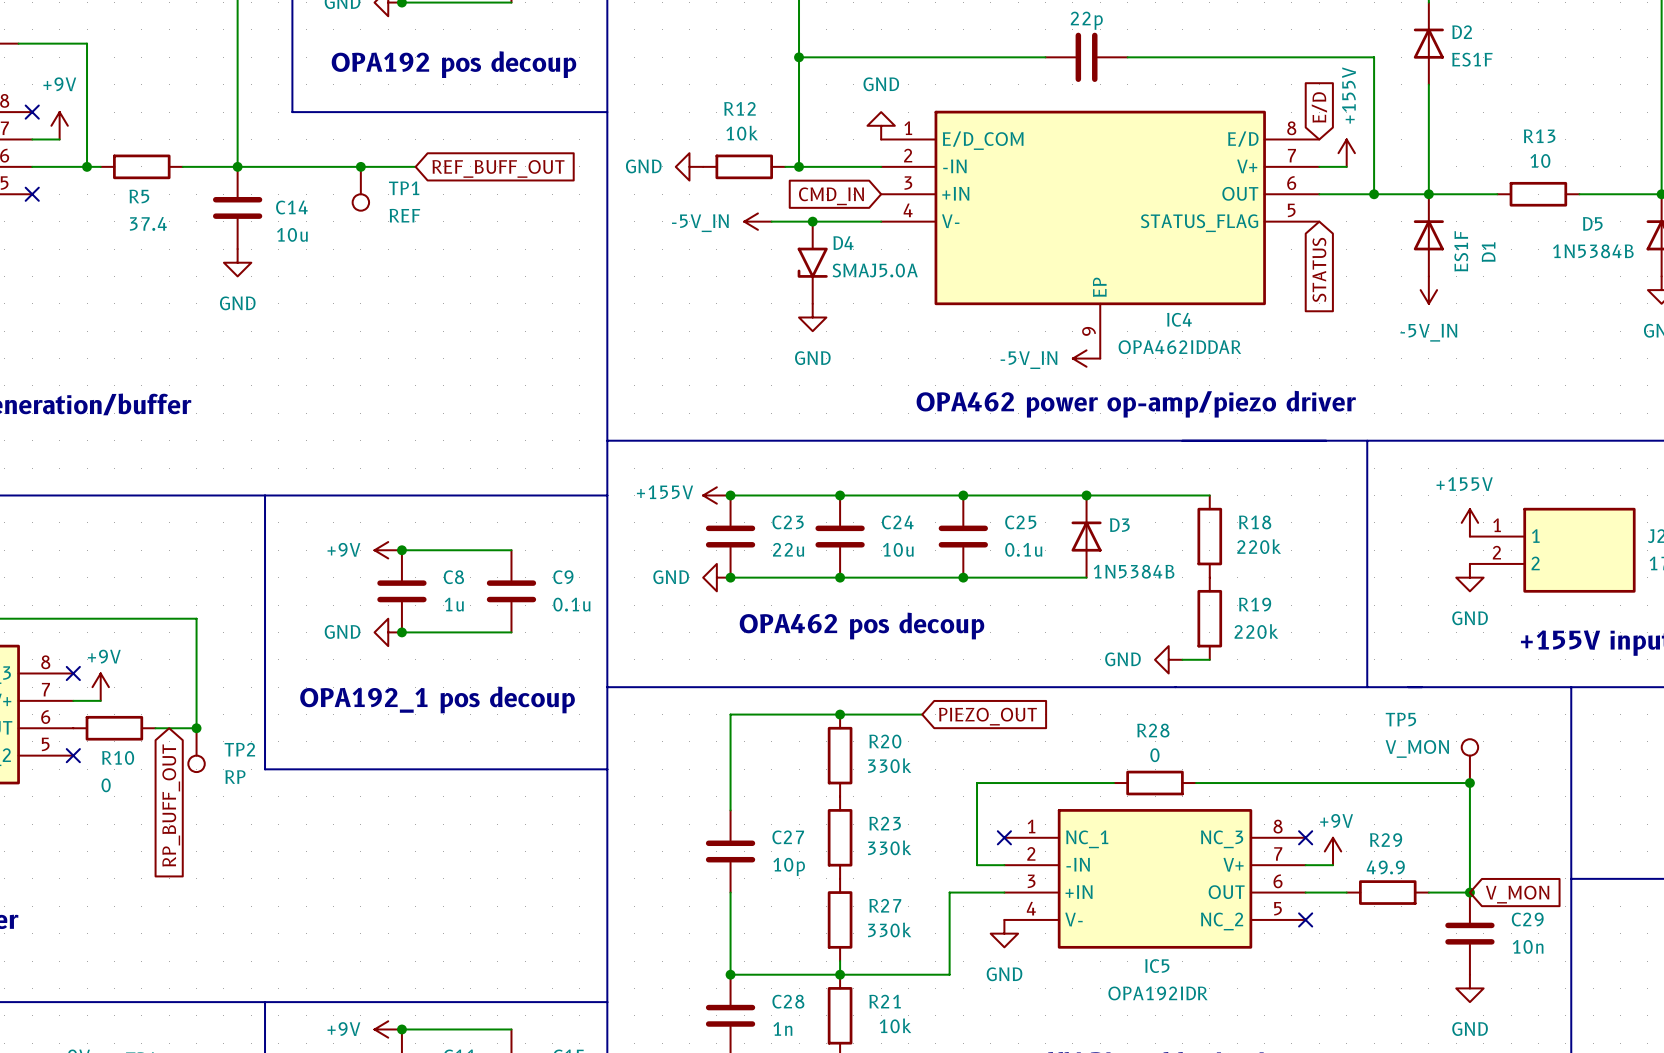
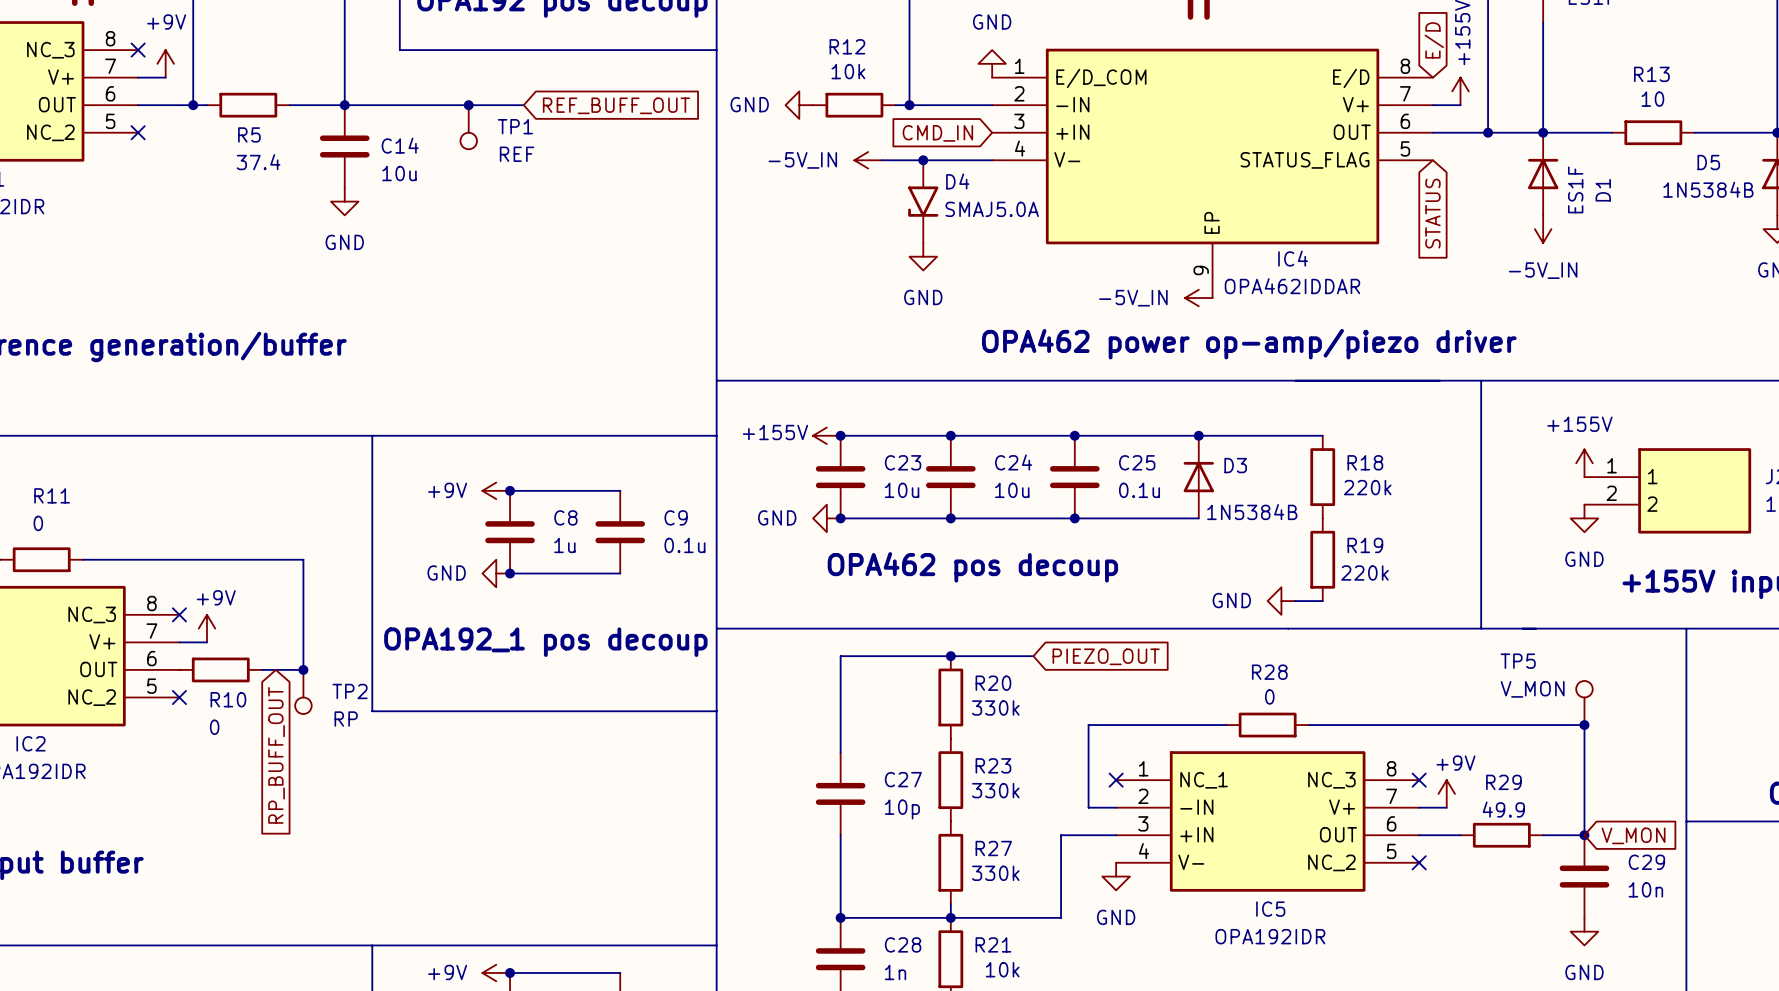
C23 value: 22u (788, 549) -> 10u (902, 490)

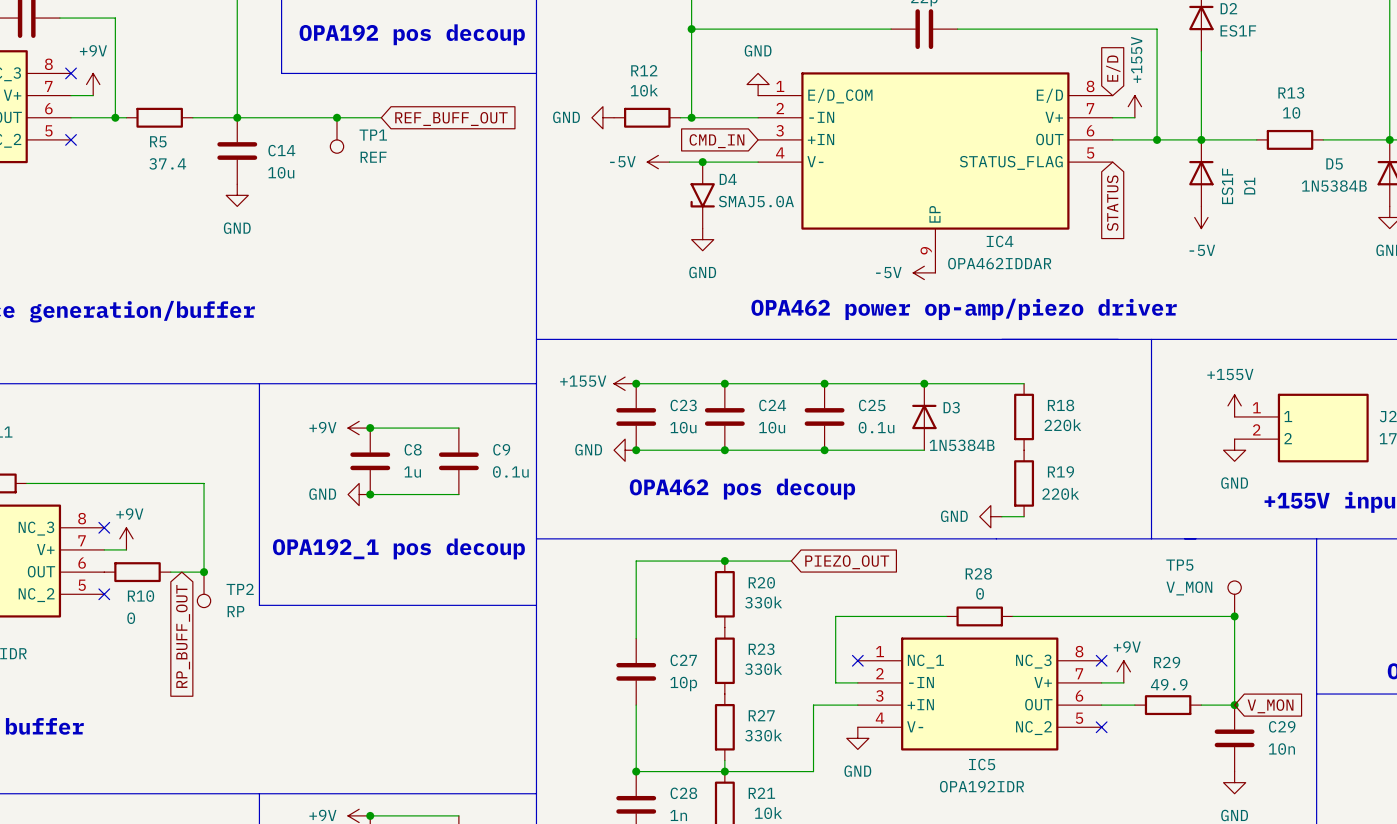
power symbol: -5V_IN (868, 160) -> -5V (658, 162)
power symbol: -5V_IN (1543, 229) -> -5V (1201, 217)
power symbol: -5V_IN (1198, 298) -> -5V (924, 272)

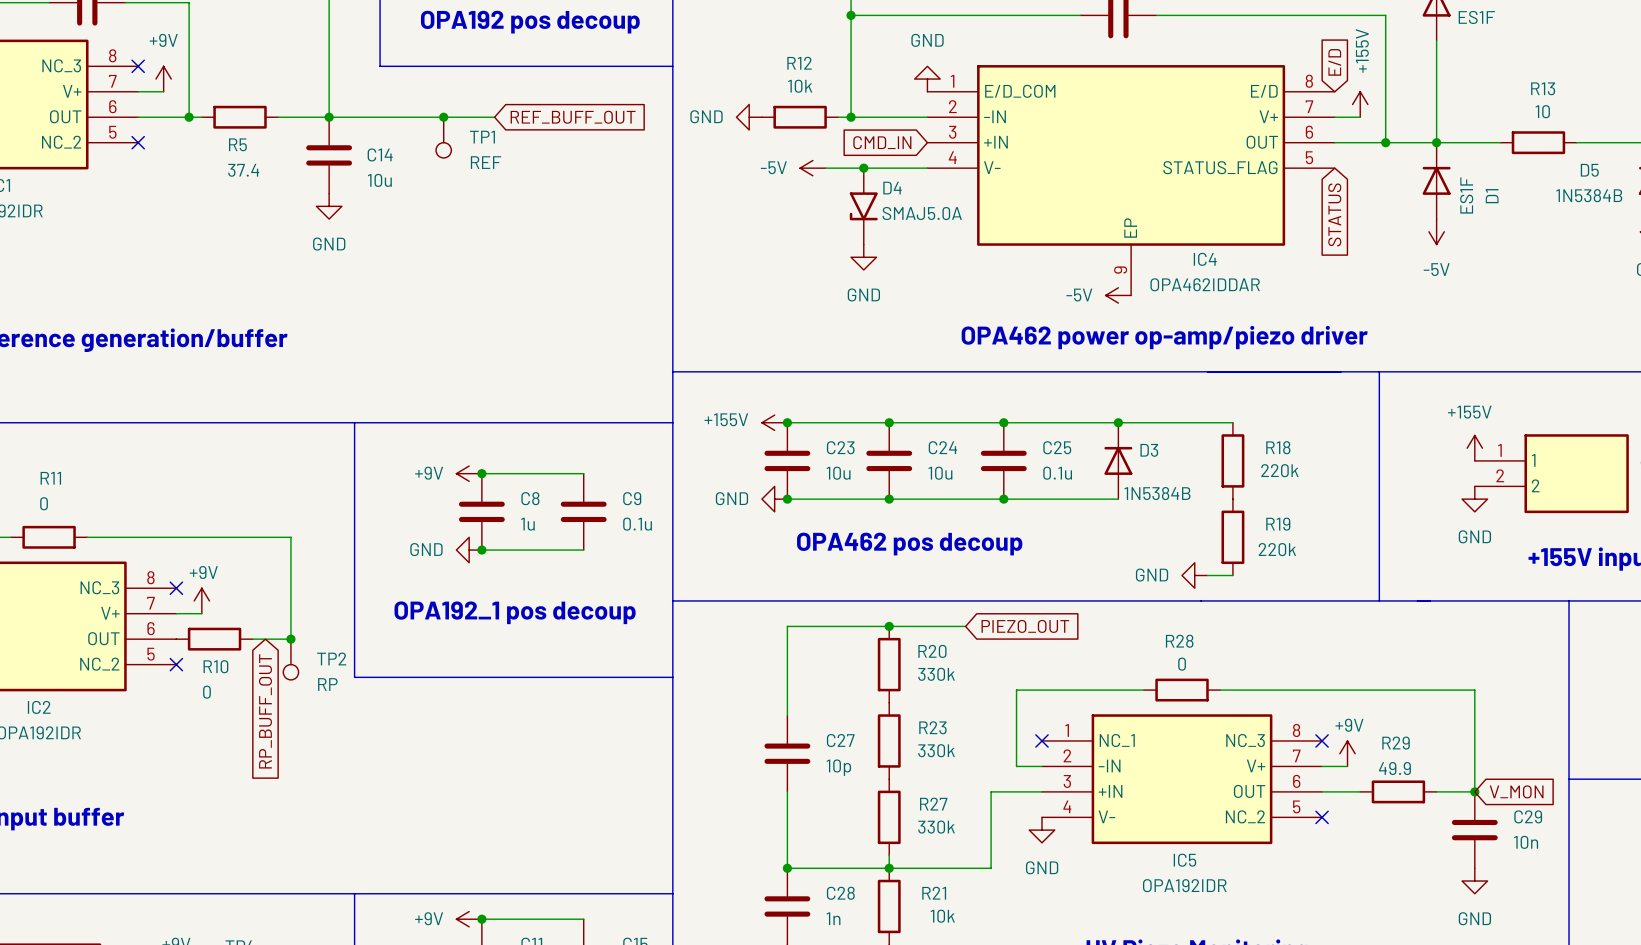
TP5: V_MON (1234, 598) -> none
junction: (1234, 616) -> none

